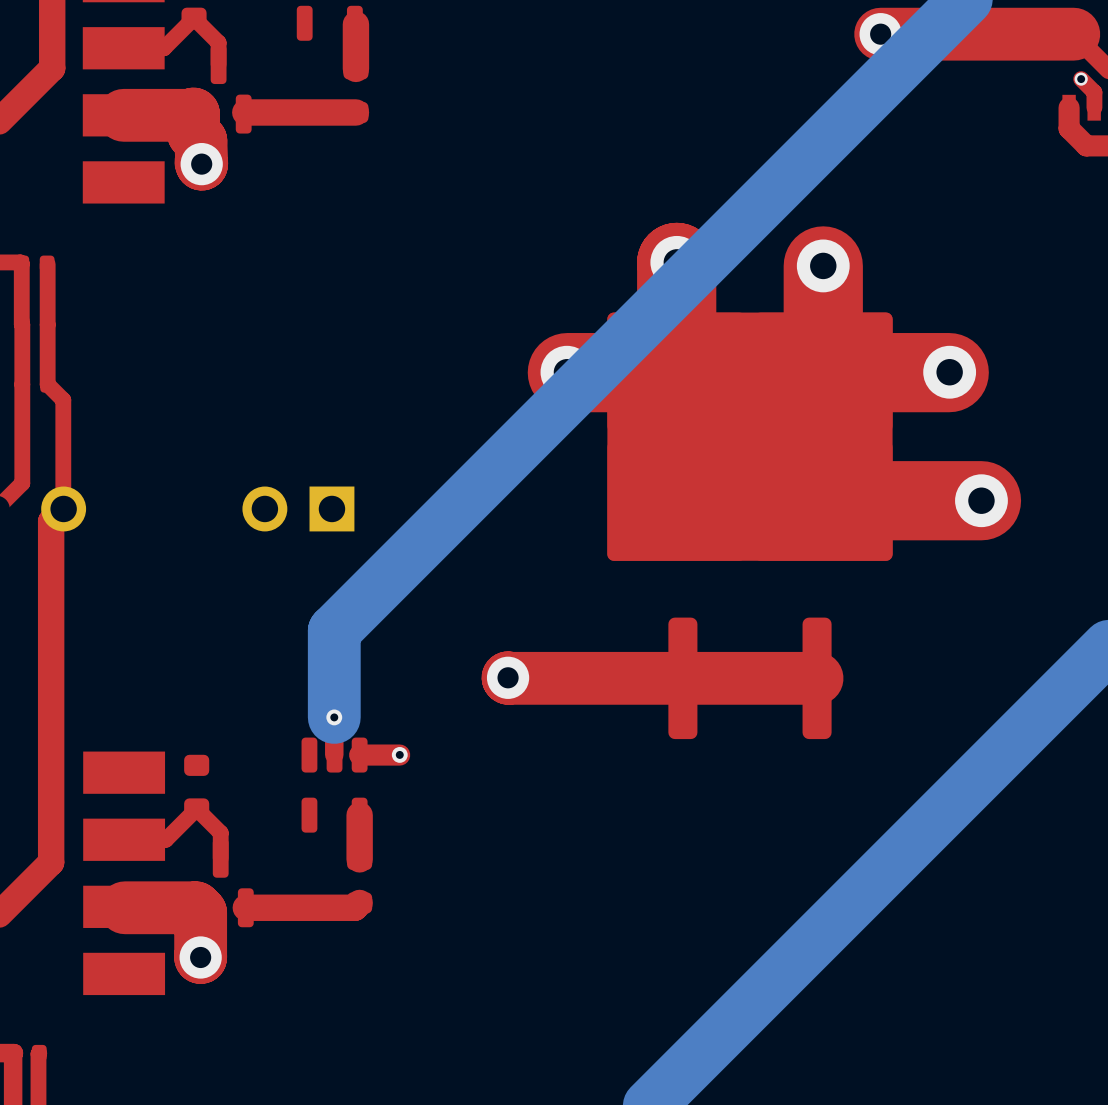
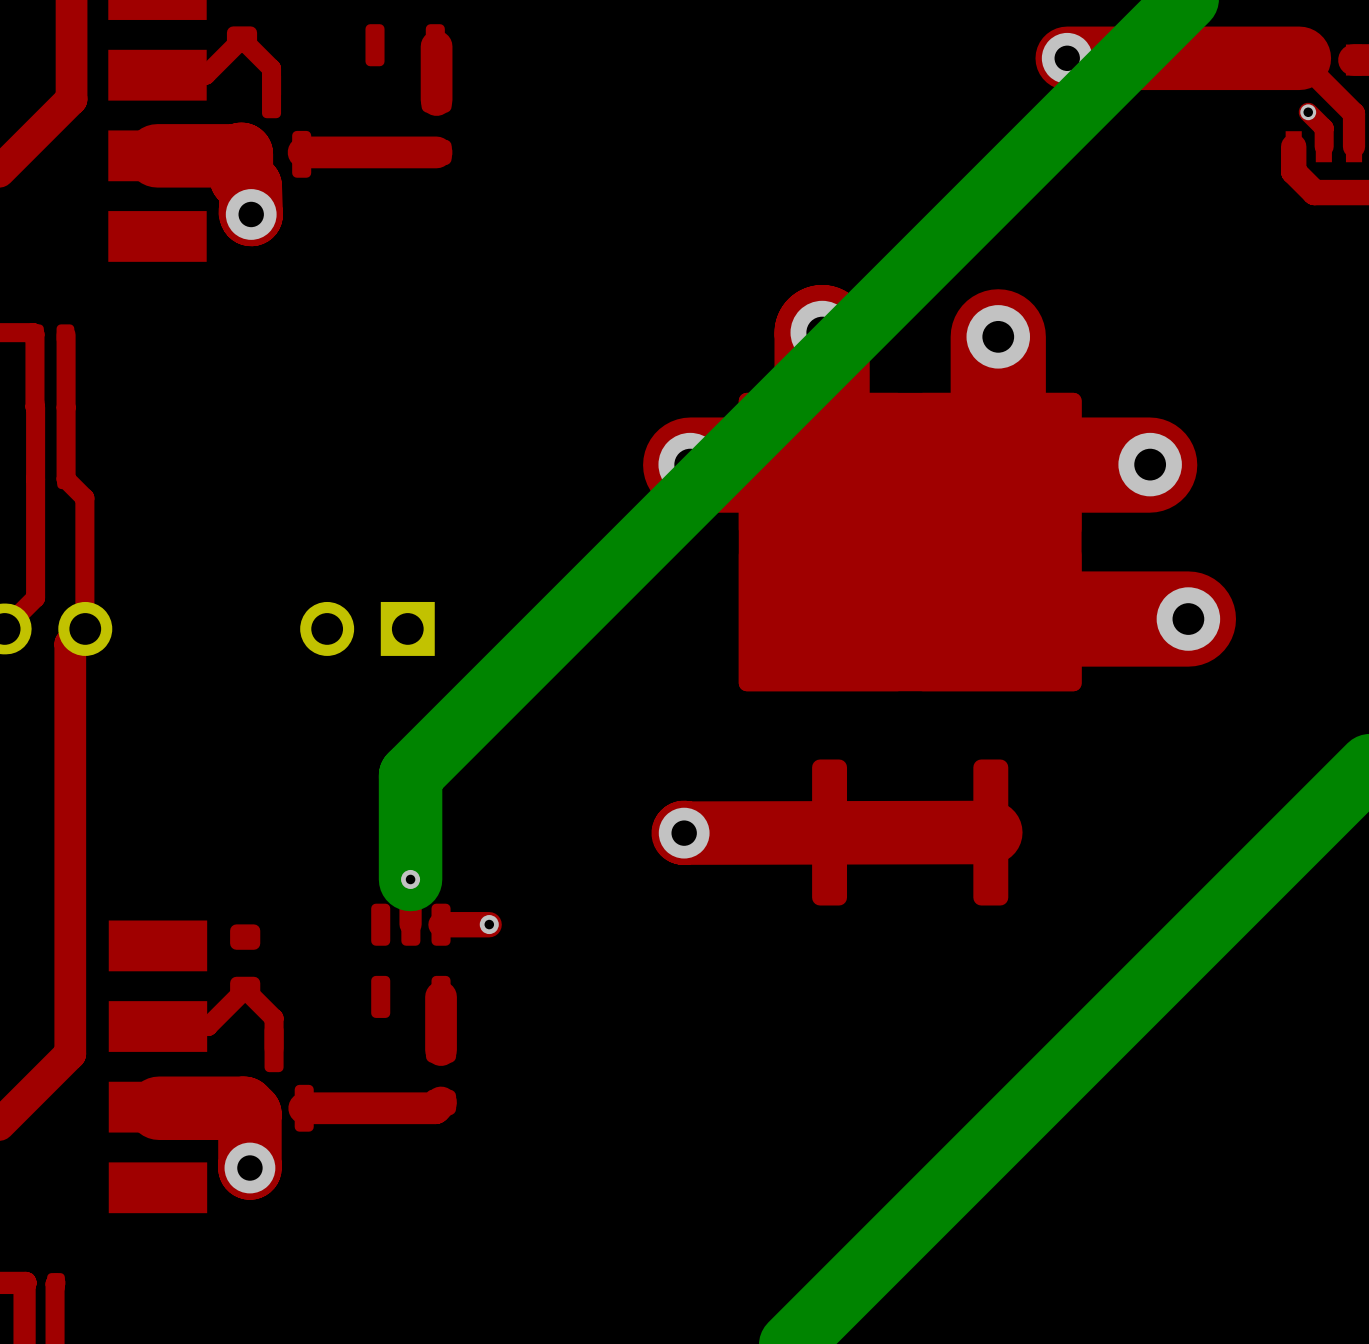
top track: (508, 677) (817, 678) -> (683, 833) (990, 832)
via position: (508, 677) -> (684, 833)

